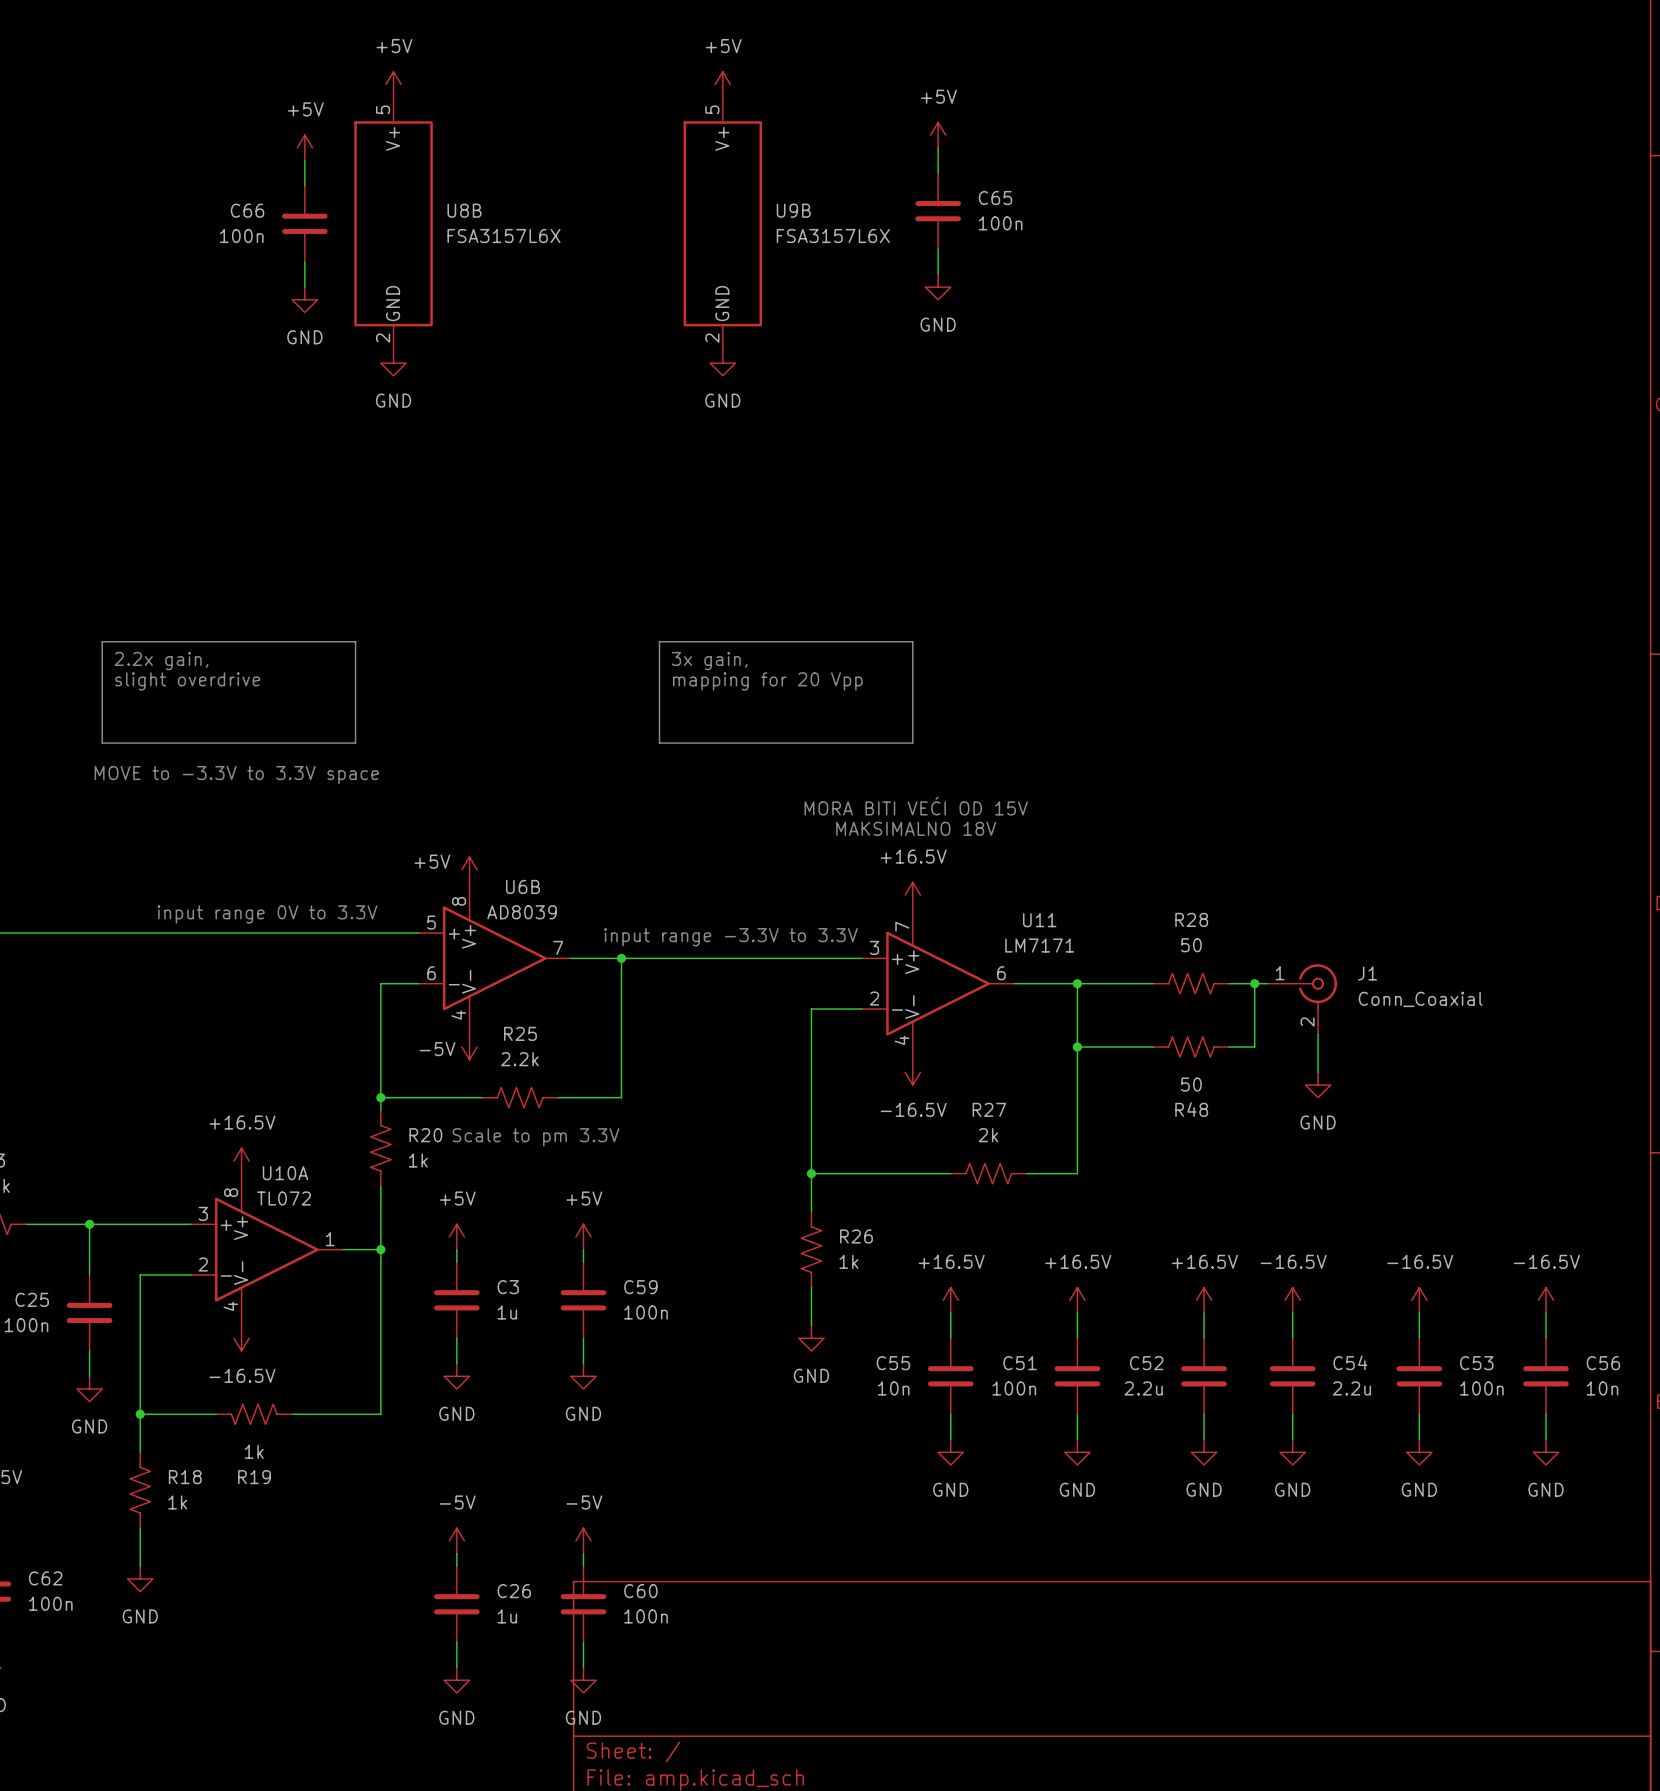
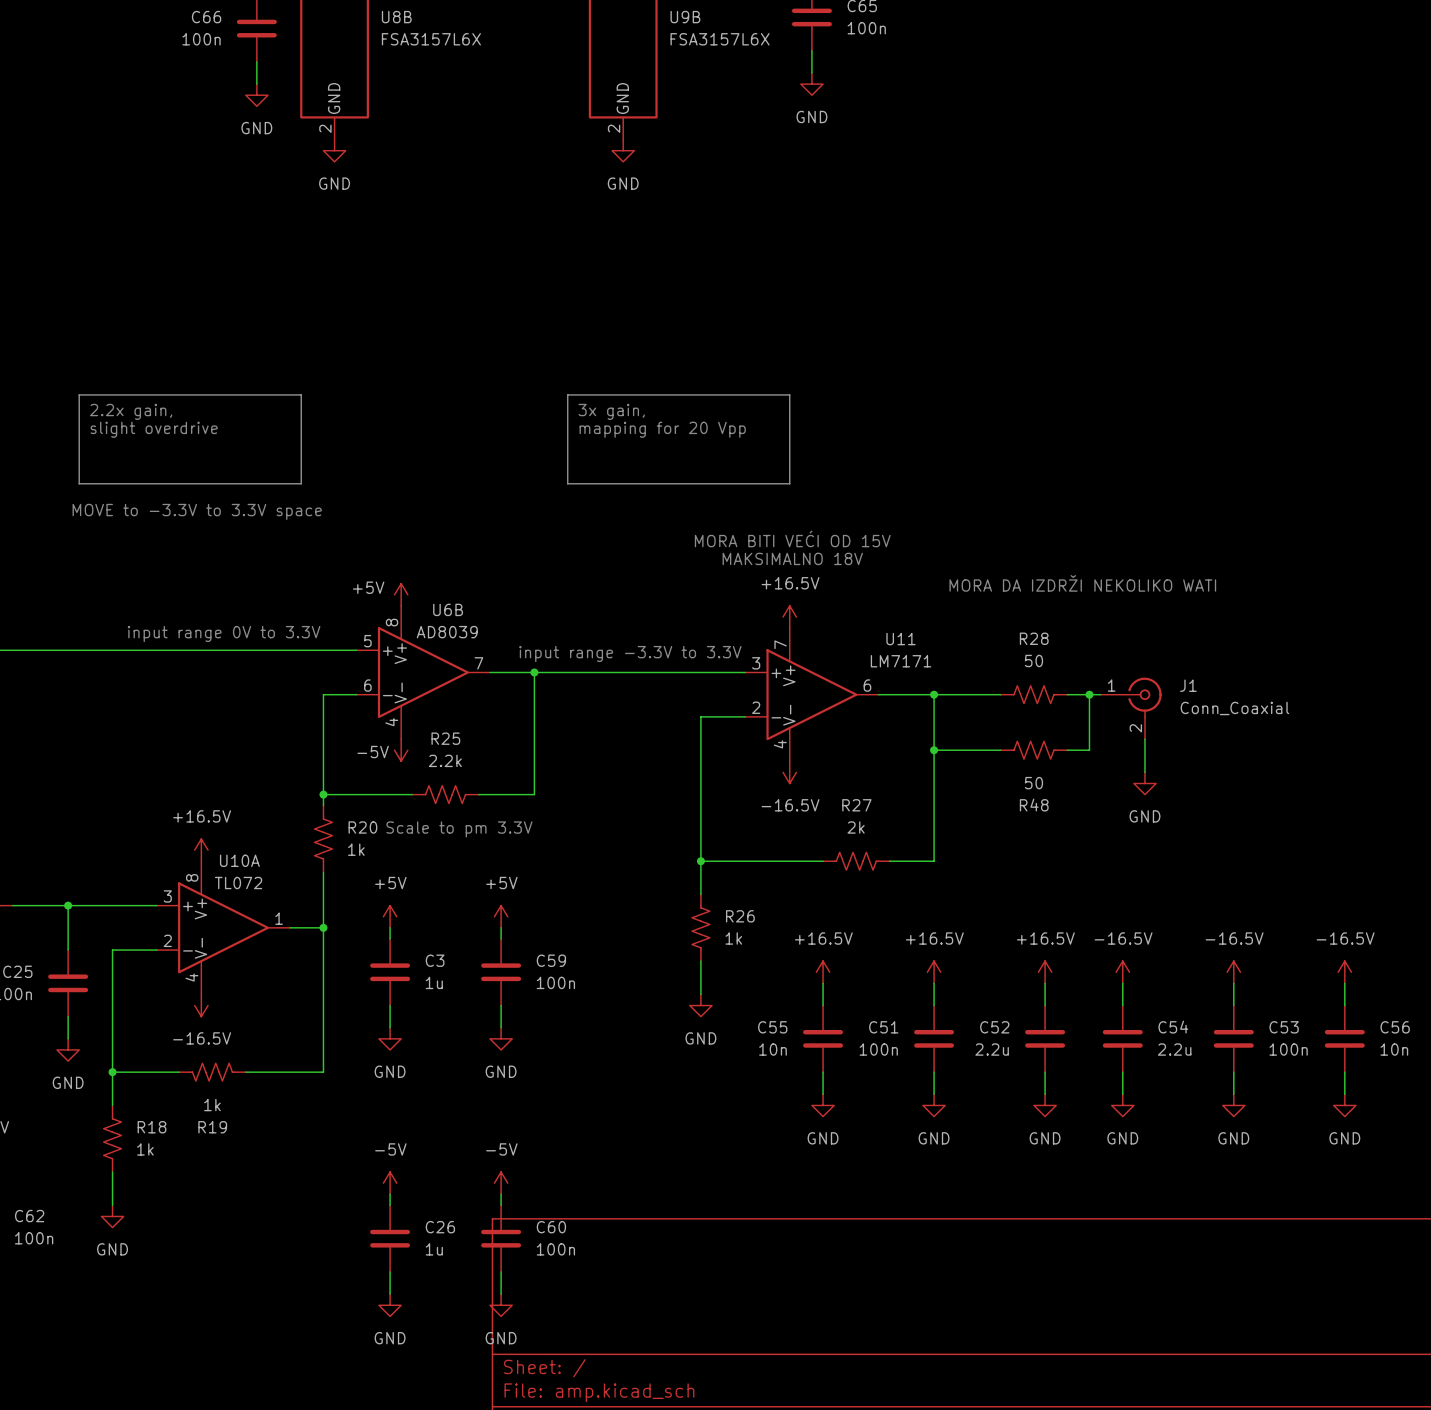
text: none -> MORA DA IZDRŽI NEKOLIKO WATI (1082, 583)

